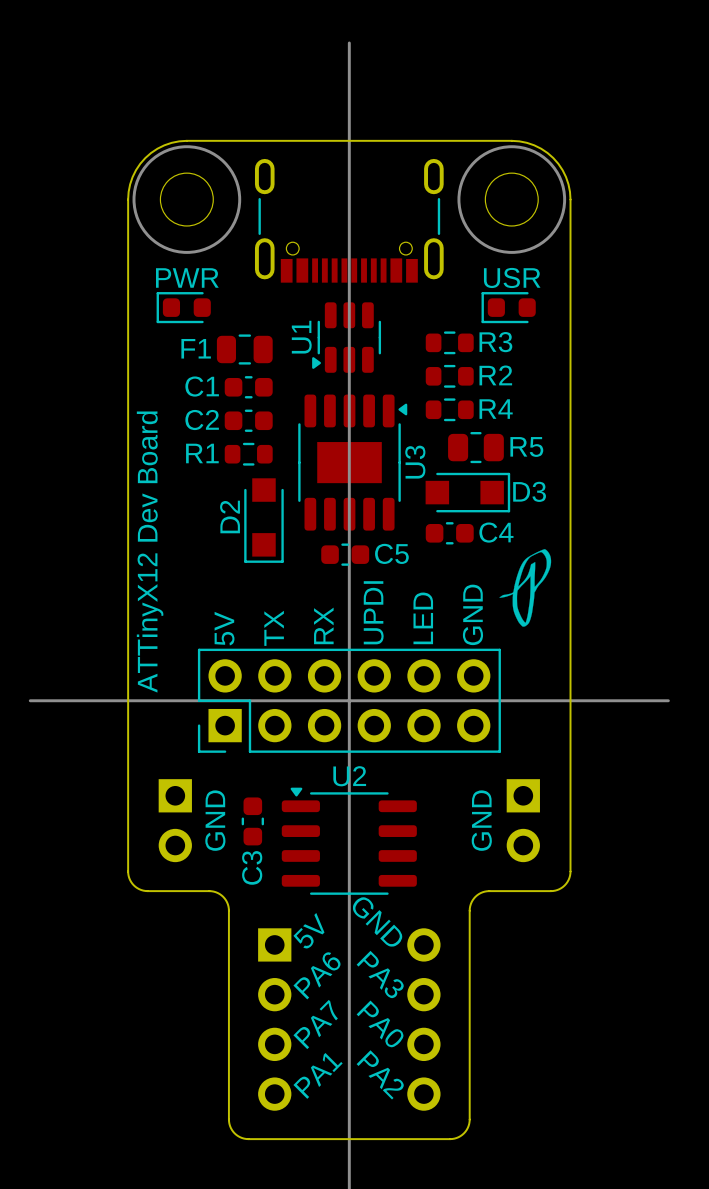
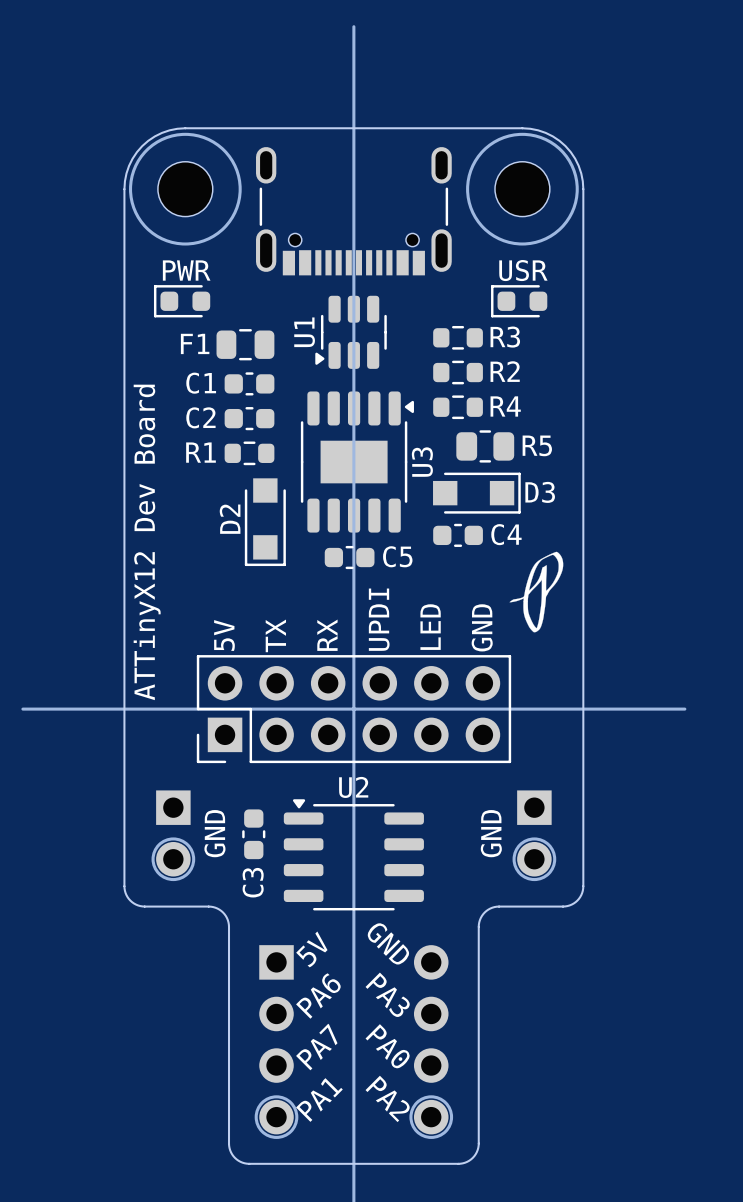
drawing: none -> [151, 837, 196, 882]
drawing: none -> [512, 837, 557, 882]
drawing: none -> [254, 1095, 299, 1139]
drawing: none -> [409, 1095, 454, 1139]

